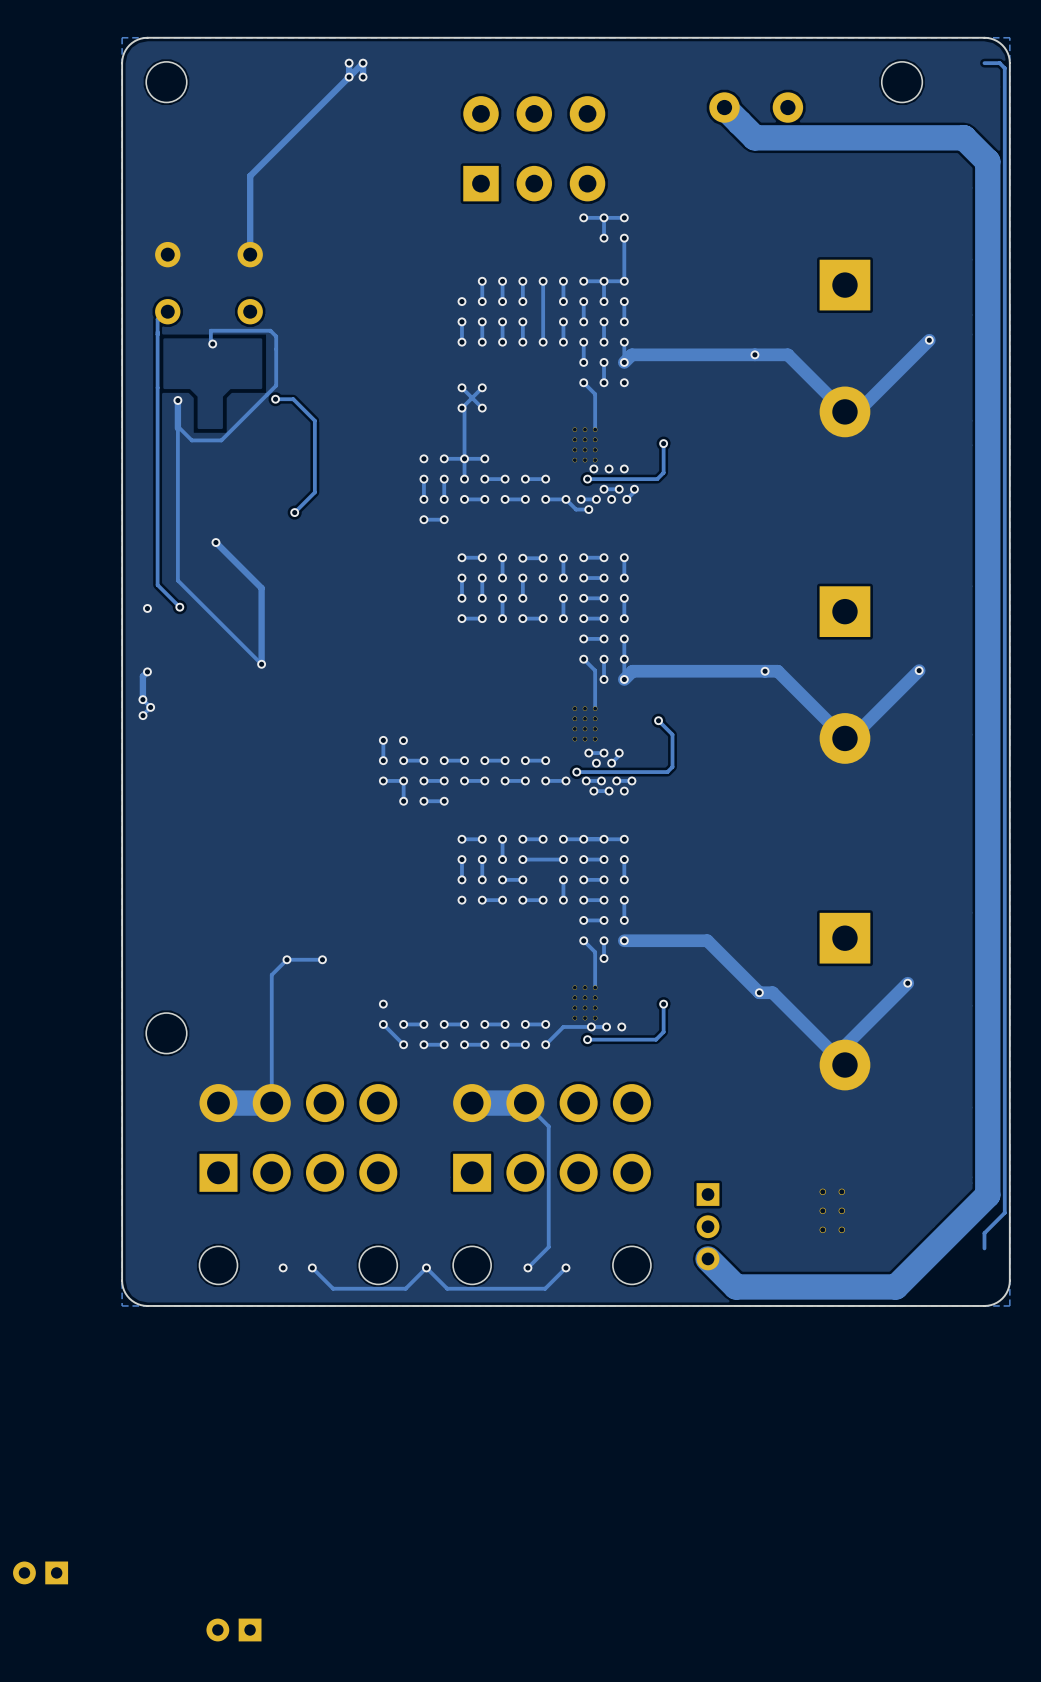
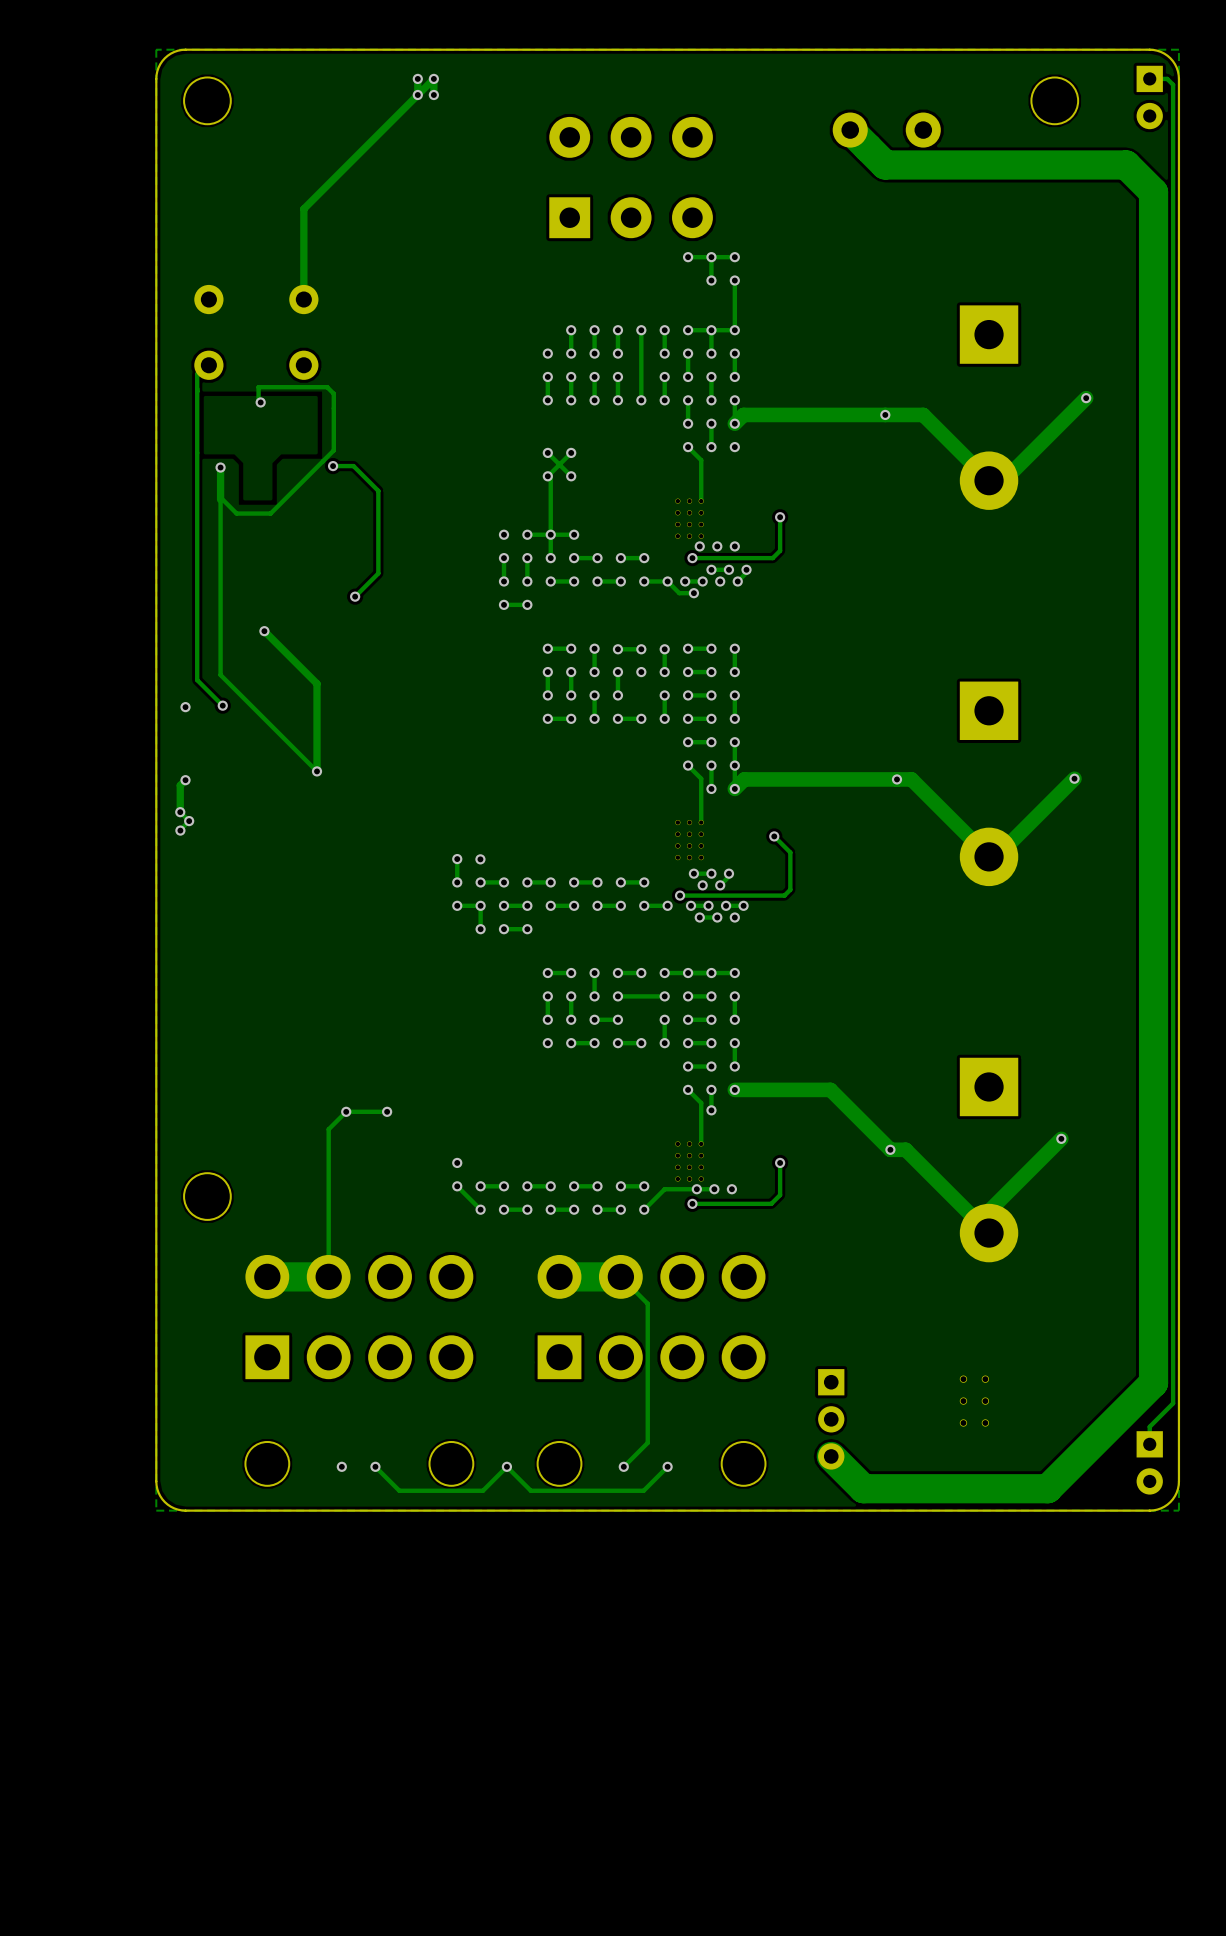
part: none -> (1149, 97)
part: none -> (1149, 1462)
part: (40, 1572) -> none
part: (233, 1630) -> none

